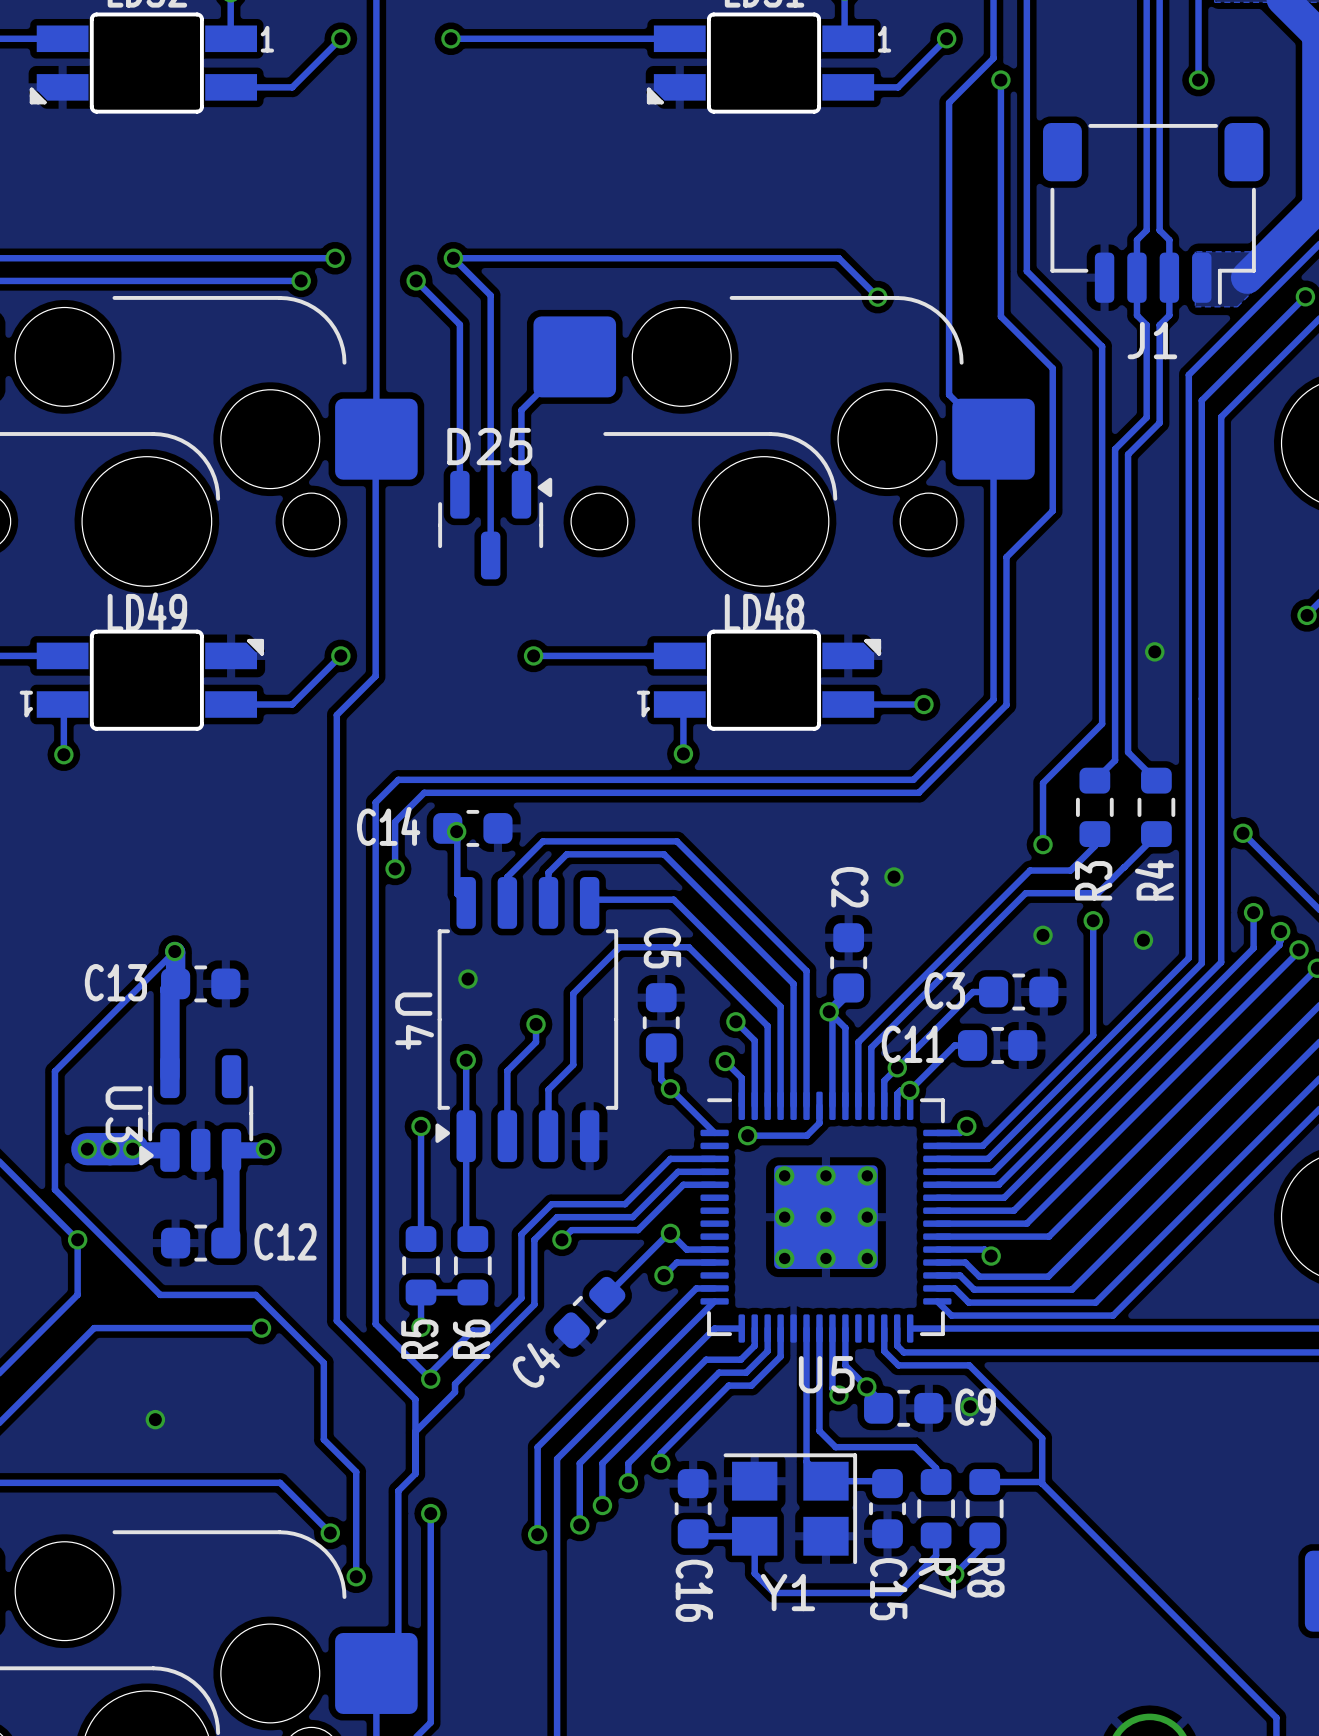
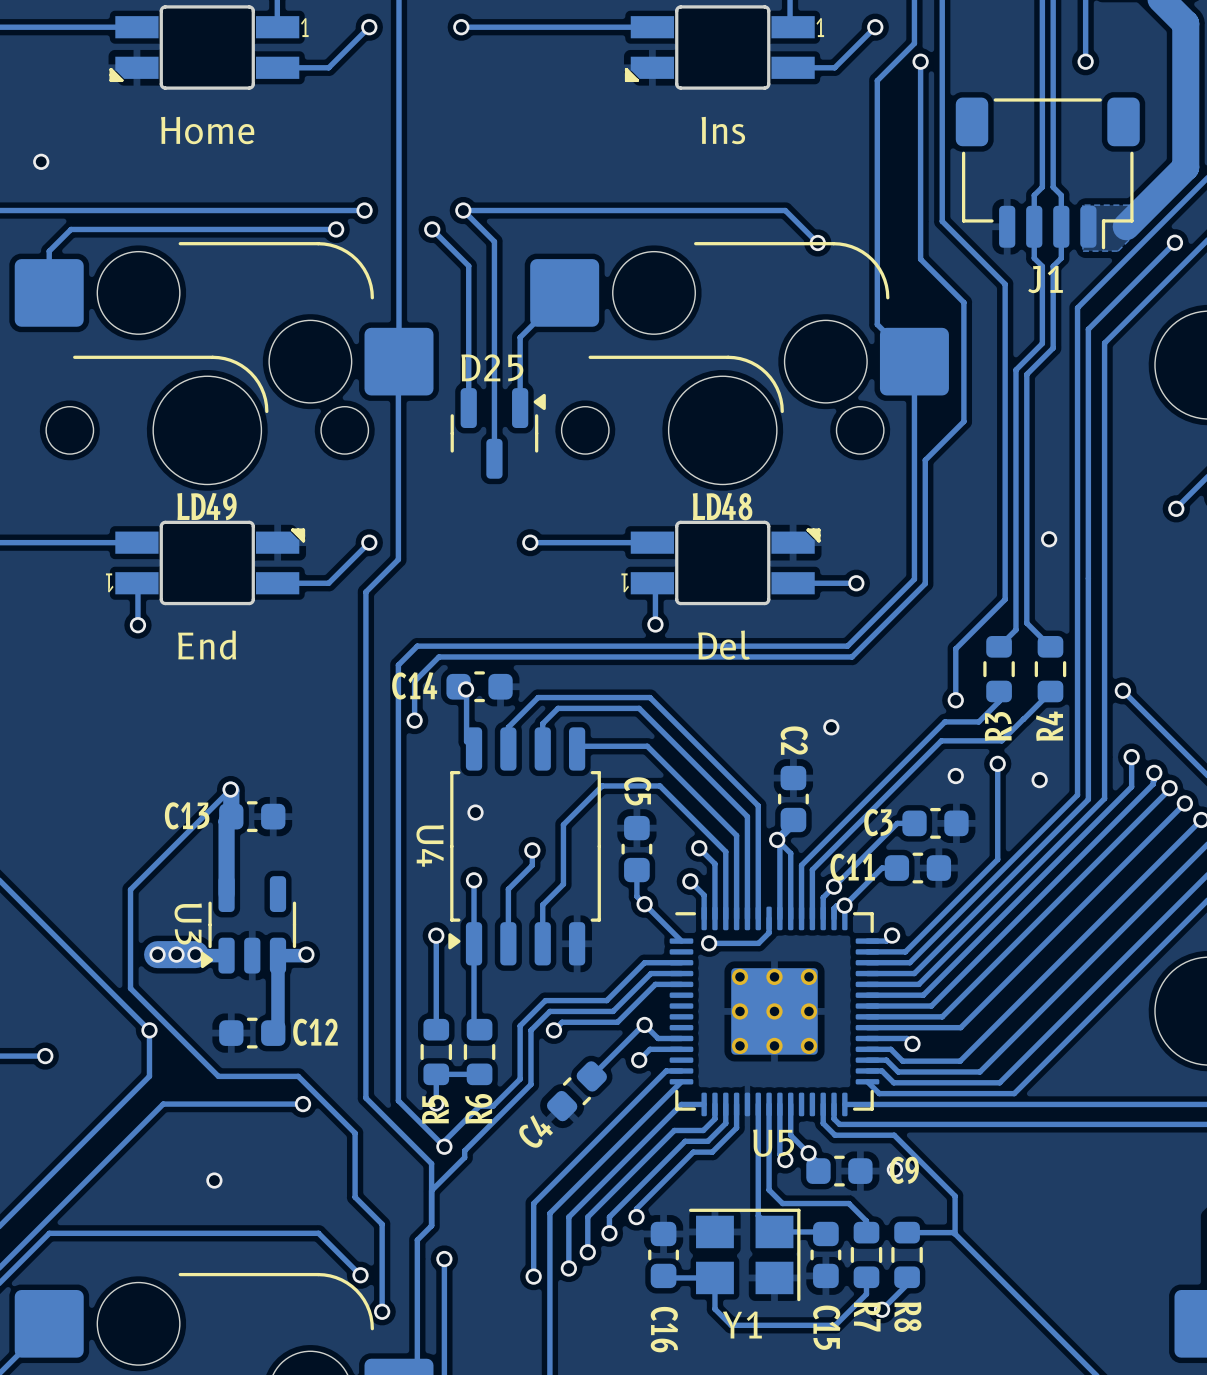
part value: none -> Home (207, 130)
part value: none -> Ins (723, 130)
part value: none -> End (207, 645)
part value: none -> Del (724, 645)

